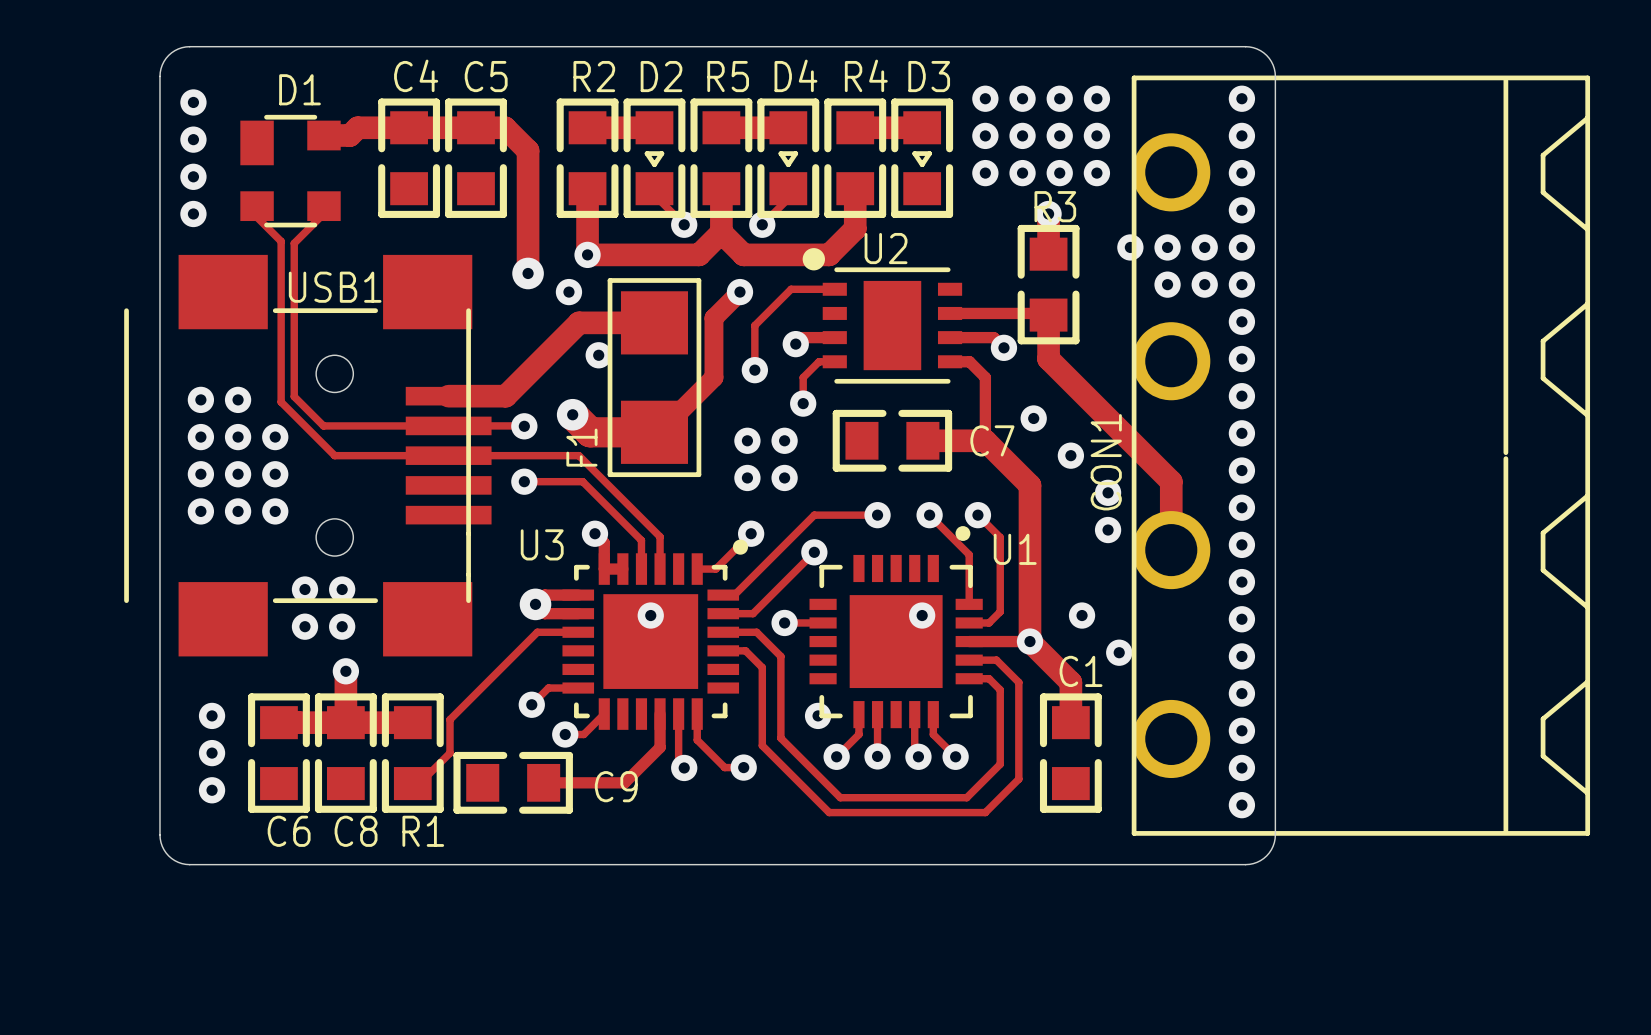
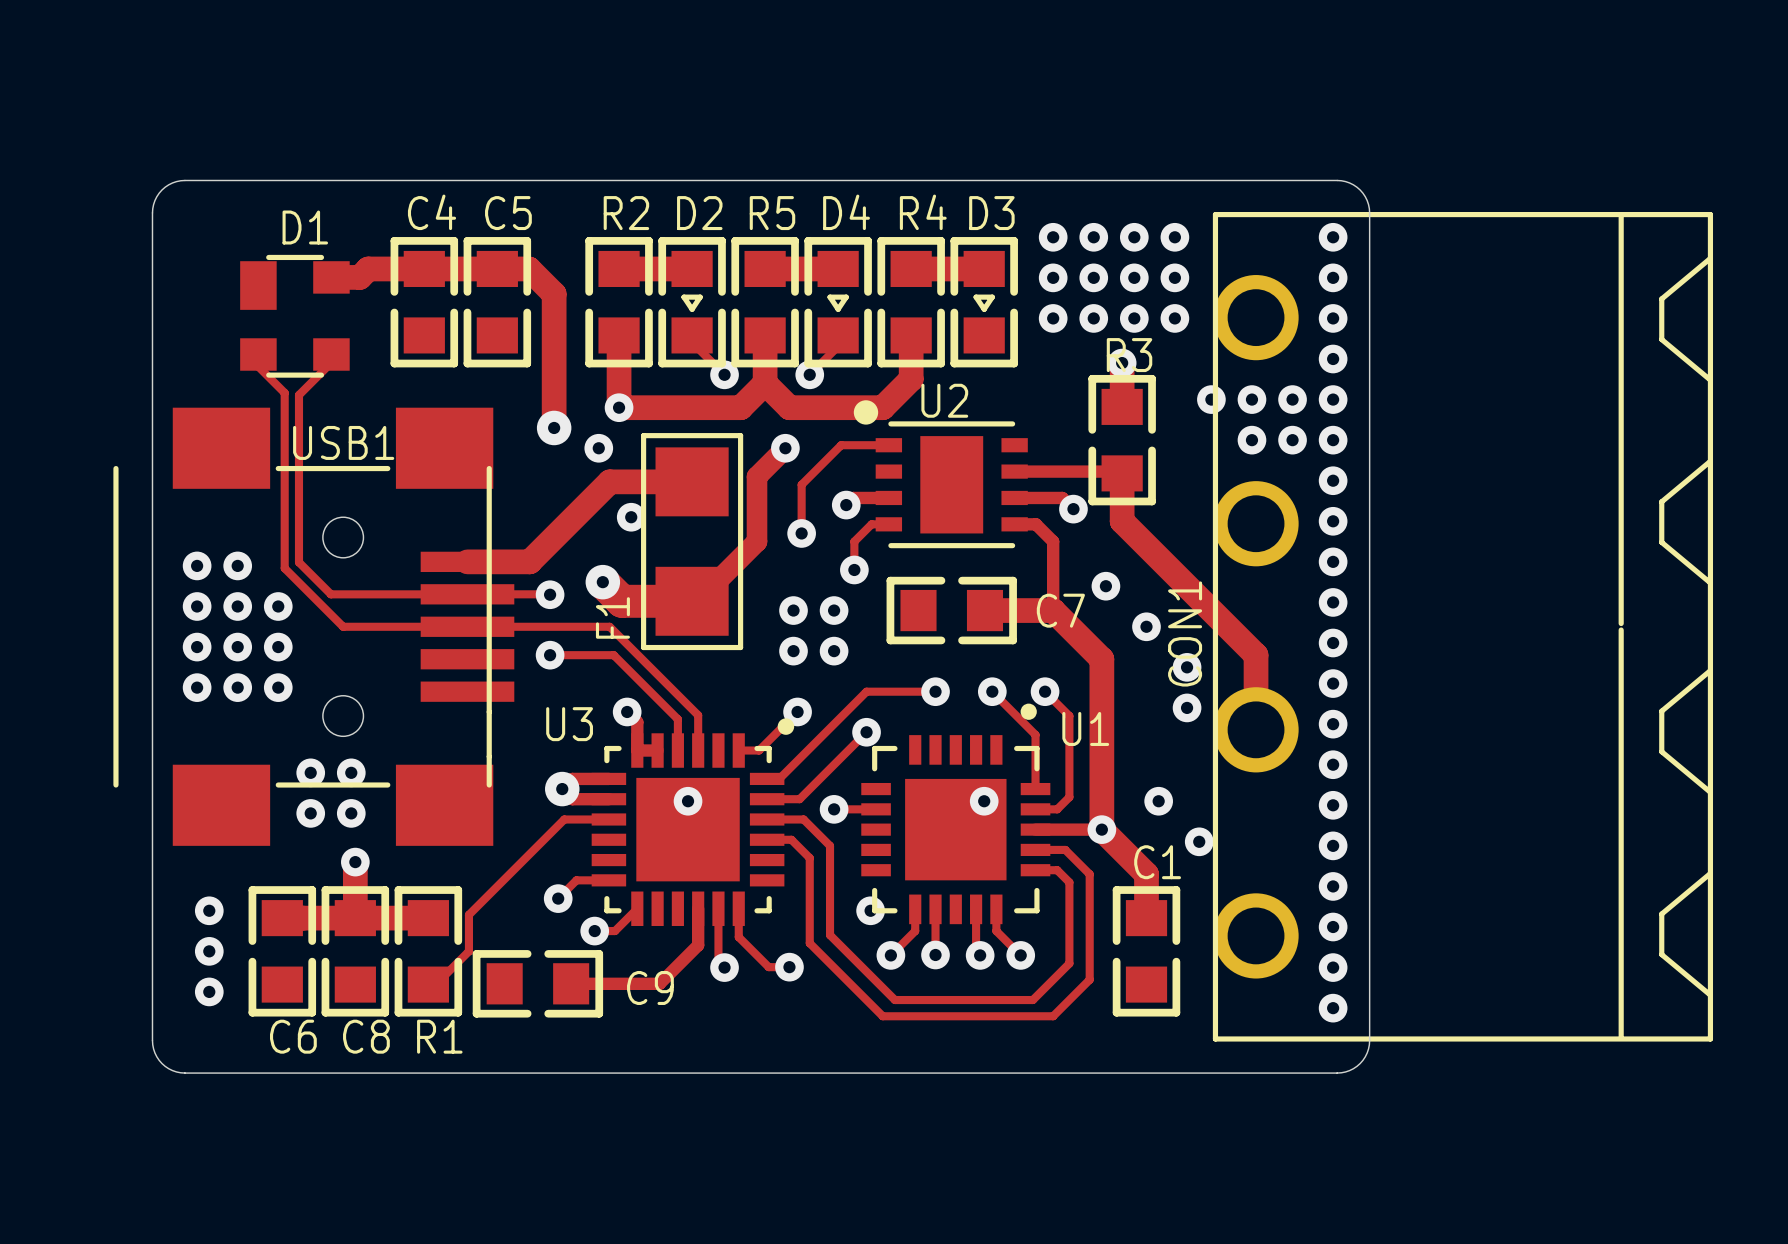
via: (193, 102) -> none
via: (193, 139) -> none
via: (193, 176) -> none
via: (193, 213) -> none

